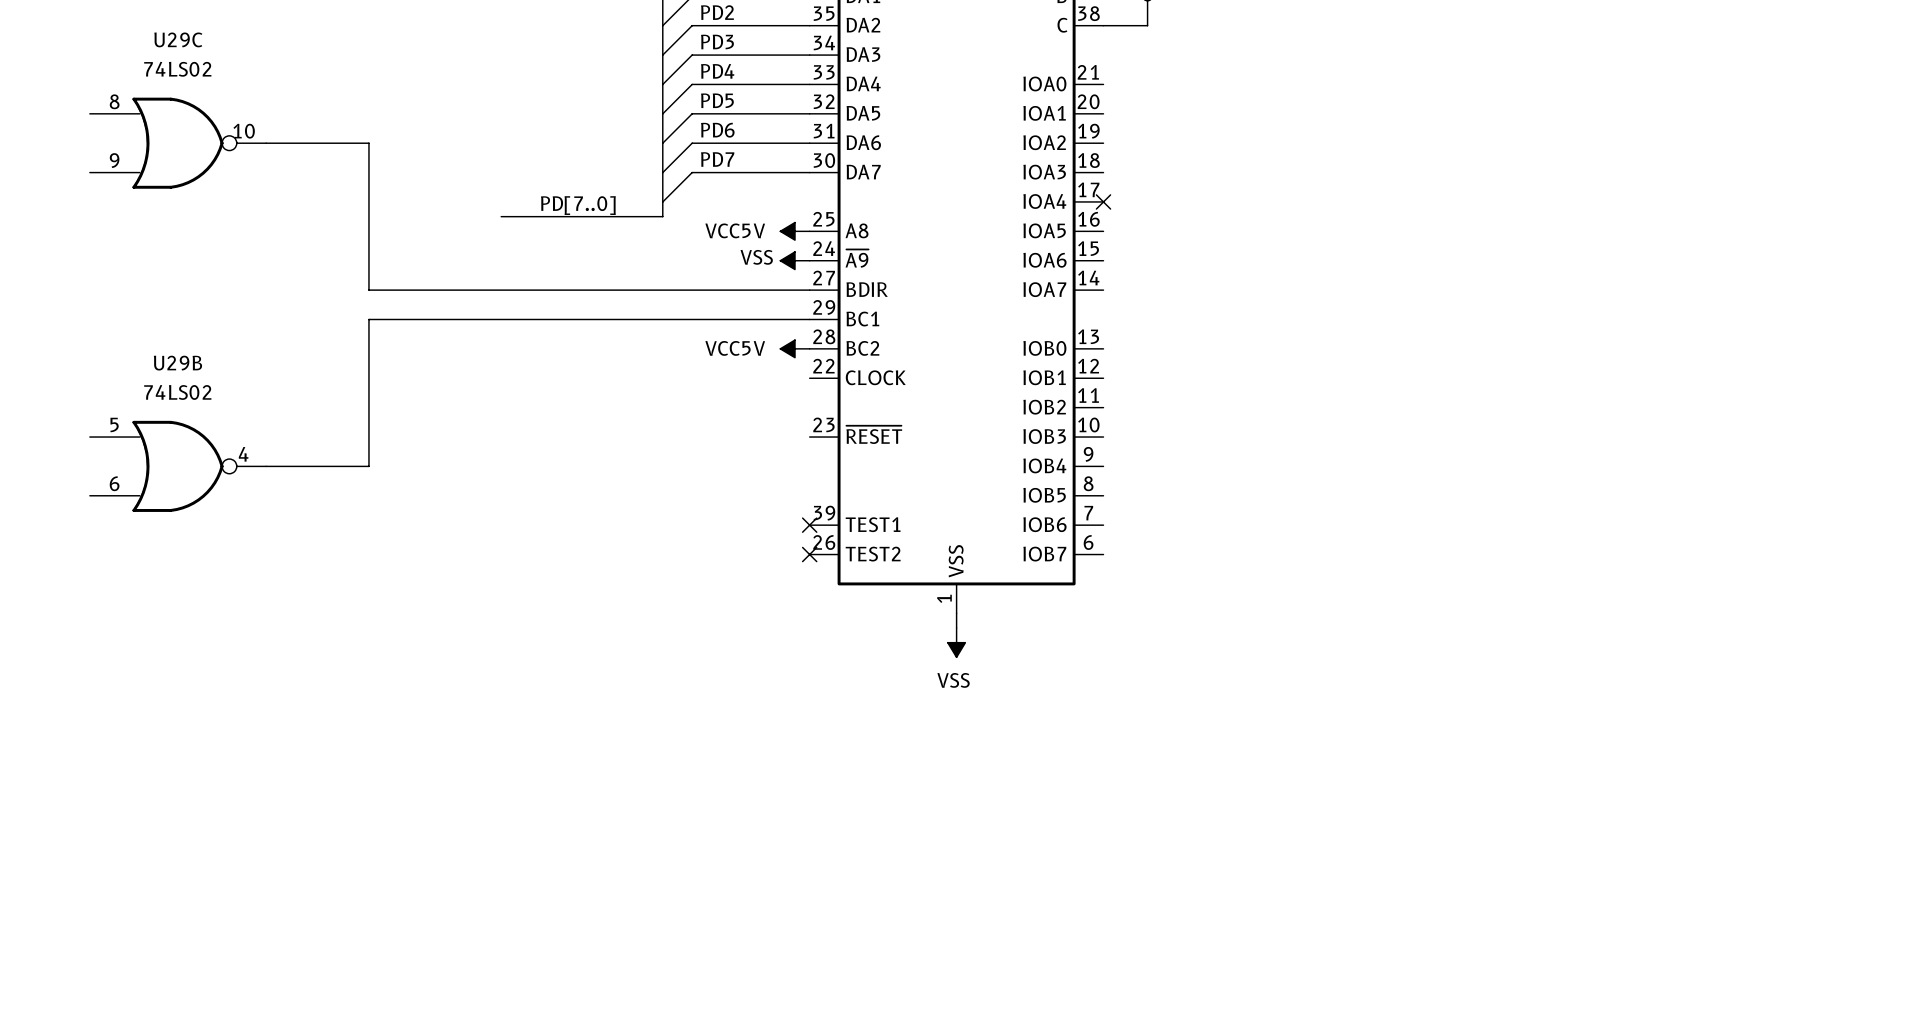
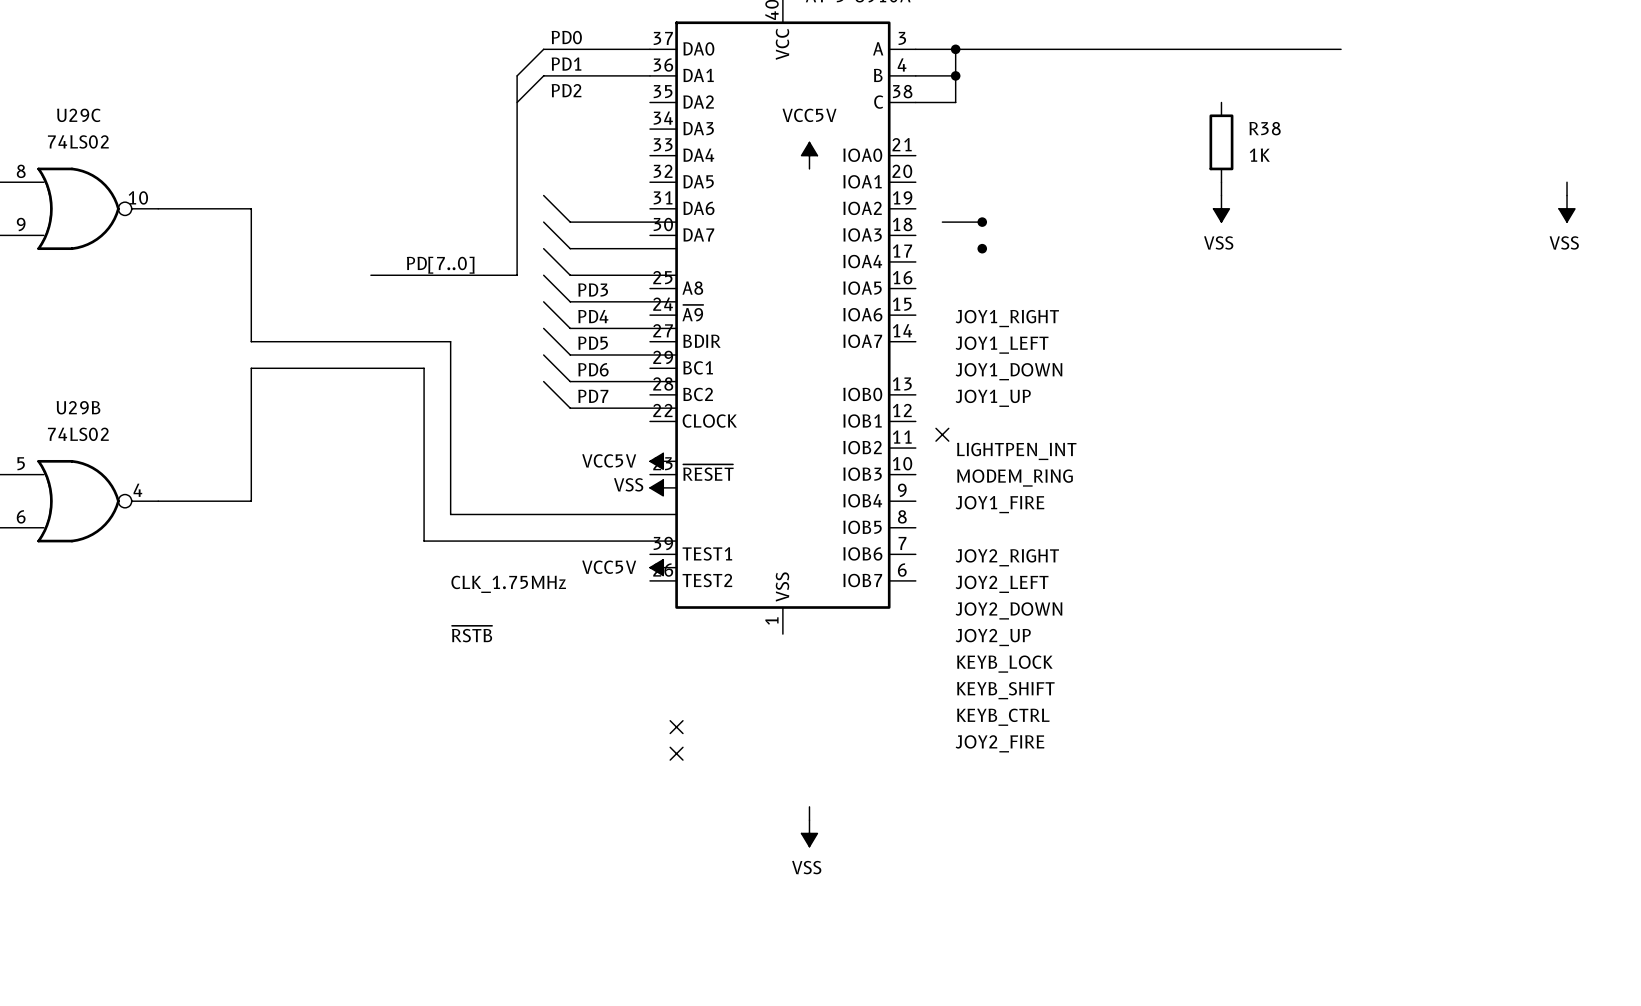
wire: (809, 25) (692, 25) (662, 55) -> none
label position: PD3 (717, 41) -> PD3 (593, 290)
wire: (809, 55) (692, 55) (662, 84) -> none
R38: none -> 1K (1221, 142)
label position: PD4 (717, 71) -> PD4 (593, 316)
wire: (809, 84) (692, 84) (662, 113) -> none
power symbol: none -> VCC5V (809, 155)
label position: PD5 (717, 100) -> PD5 (593, 343)
wire: (809, 113) (692, 113) (662, 143) -> none
wire: none -> (1221, 182) (1221, 195)
wire: none -> (1567, 182) (1567, 195)
wire: none -> (543, 195) (570, 222) (676, 222)
label position: PD6 (717, 130) -> PD6 (593, 369)
wire: (809, 143) (692, 143) (662, 172) -> none
power symbol: none -> VSS (1221, 208)
power symbol: none -> VSS (1567, 208)
wire: none -> (543, 222) (570, 248) (676, 248)
wire: none -> (942, 222) (982, 222)
junction: none -> (982, 222)
label position: PD7 (717, 159) -> PD7 (593, 396)
wire: (809, 172) (692, 172) (662, 201) -> none
wire: none -> (543, 248) (570, 275) (676, 275)
junction: none -> (982, 248)
no-connect mark: (1103, 201) -> none
wire: none -> (543, 275) (570, 301) (676, 301)
power symbol: VCC5V (795, 231) -> none
wire: none -> (543, 301) (570, 328) (676, 328)
power symbol: VSS (795, 260) -> none
label: none -> JOY1_RIGHT (1007, 318)
wire: none -> (543, 328) (570, 355) (676, 355)
wire: (589, 290) (809, 290) -> (450, 341) (450, 514) (676, 514)
label: none -> JOY1_LEFT (1002, 345)
wire: none -> (543, 355) (570, 381) (676, 381)
wire: (559, 319) (809, 319) -> (424, 368) (424, 541) (676, 541)
label: none -> JOY1_DOWN (1008, 371)
wire: none -> (543, 381) (570, 408) (676, 408)
power symbol position: VCC5V (795, 348) -> VCC5V (663, 461)
label: none -> JOY1_UP (993, 398)
no-connect mark: none -> (942, 434)
label: none -> LIGHTPEN_INT (1016, 451)
label: none -> MODEM_RING (1015, 478)
power symbol: none -> VSS (663, 487)
label: none -> JOY1_FIRE (1000, 504)
no-connect mark: (809, 525) -> none
label: none -> JOY2_RIGHT (1007, 557)
power symbol: none -> VCC5V (663, 567)
no-connect mark: (809, 554) -> none
label: none -> CLK_1.75MHz (508, 584)
label: none -> JOY2_LEFT (1002, 584)
label: none -> JOY2_DOWN (1008, 610)
label: none -> ~{RSTB} (472, 634)
wire: (956, 613) (956, 627) -> (809, 806) (809, 820)
label: none -> JOY2_UP (993, 637)
power symbol: VSS (956, 642) -> none
label: none -> KEYB_LOCK (1004, 664)
label: none -> KEYB_SHIFT (1005, 690)
label: none -> KEYB_CTRL (1003, 717)
no-connect mark: none -> (676, 727)
label: none -> JOY2_FIRE (1000, 743)
no-connect mark: none -> (676, 753)
power symbol: none -> VSS (809, 833)

